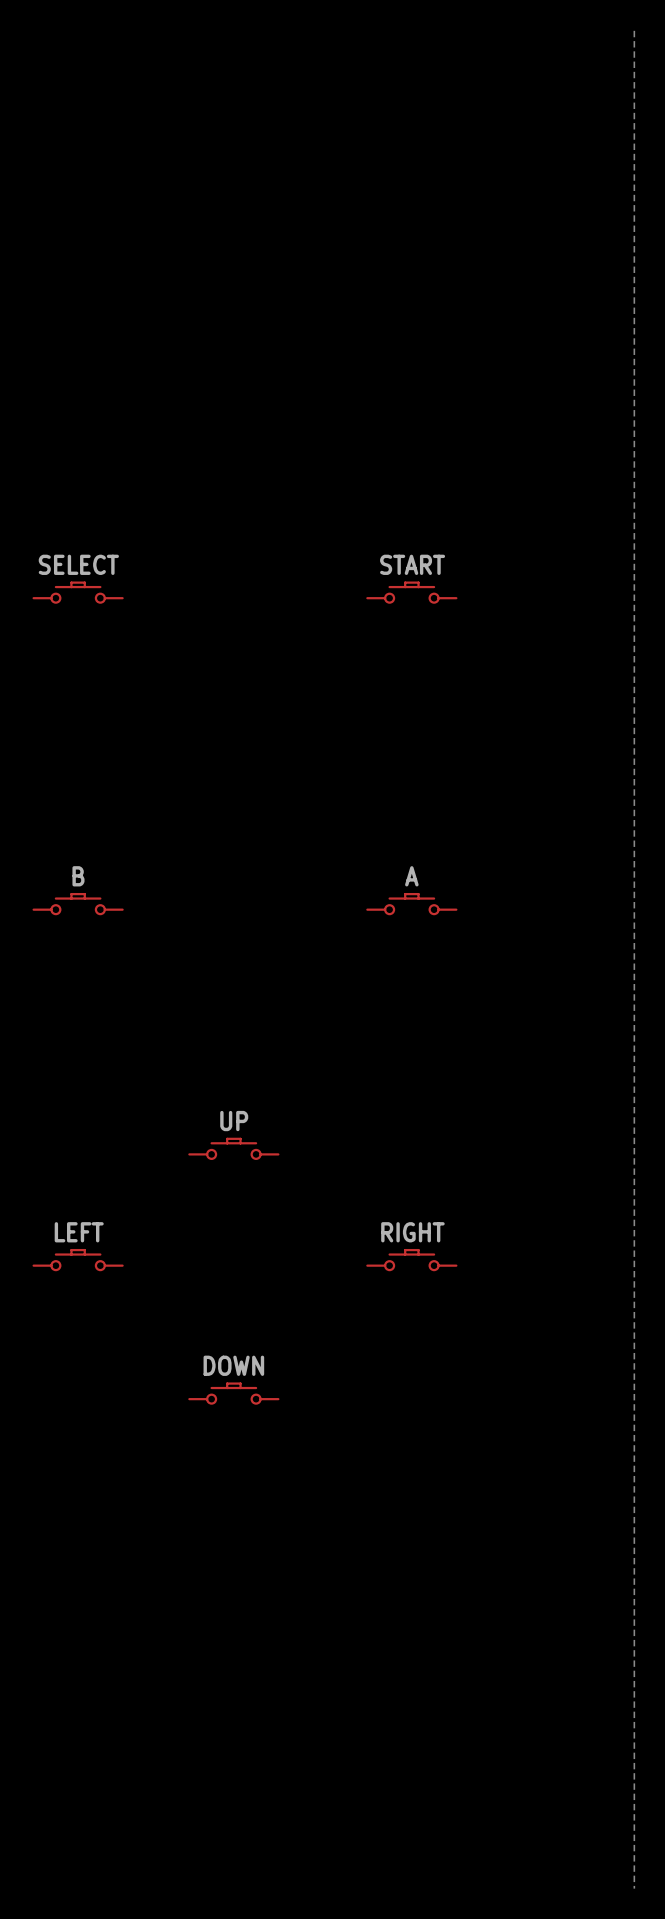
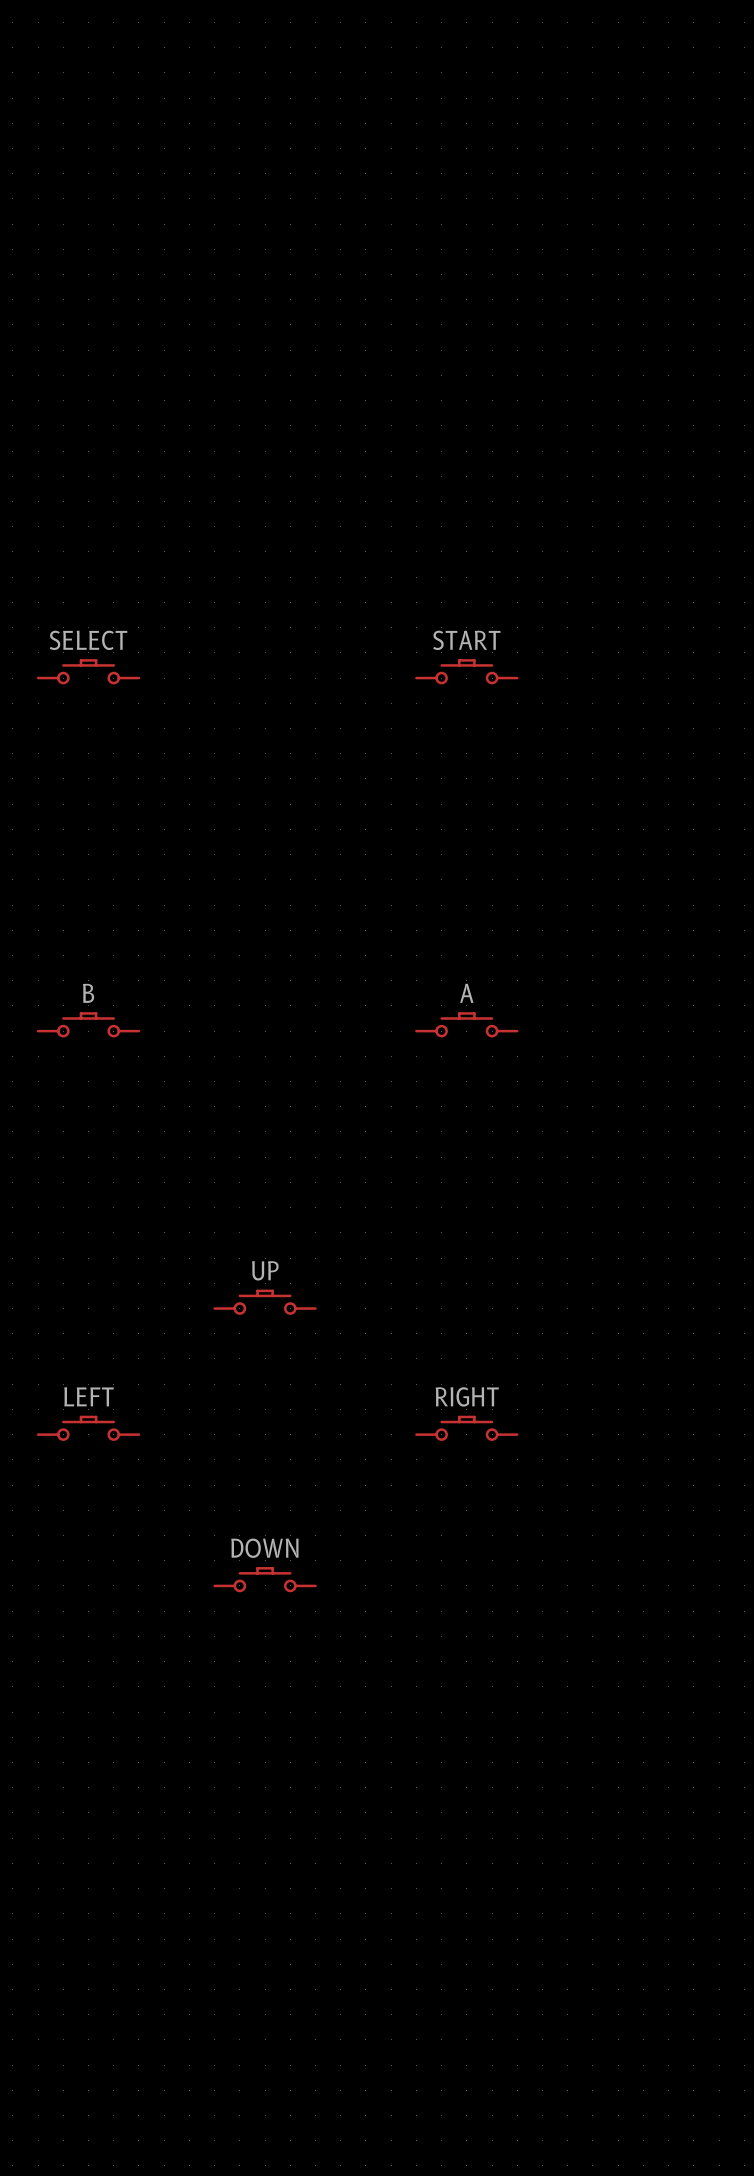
line: (634, 30) (634, 1888) -> none

